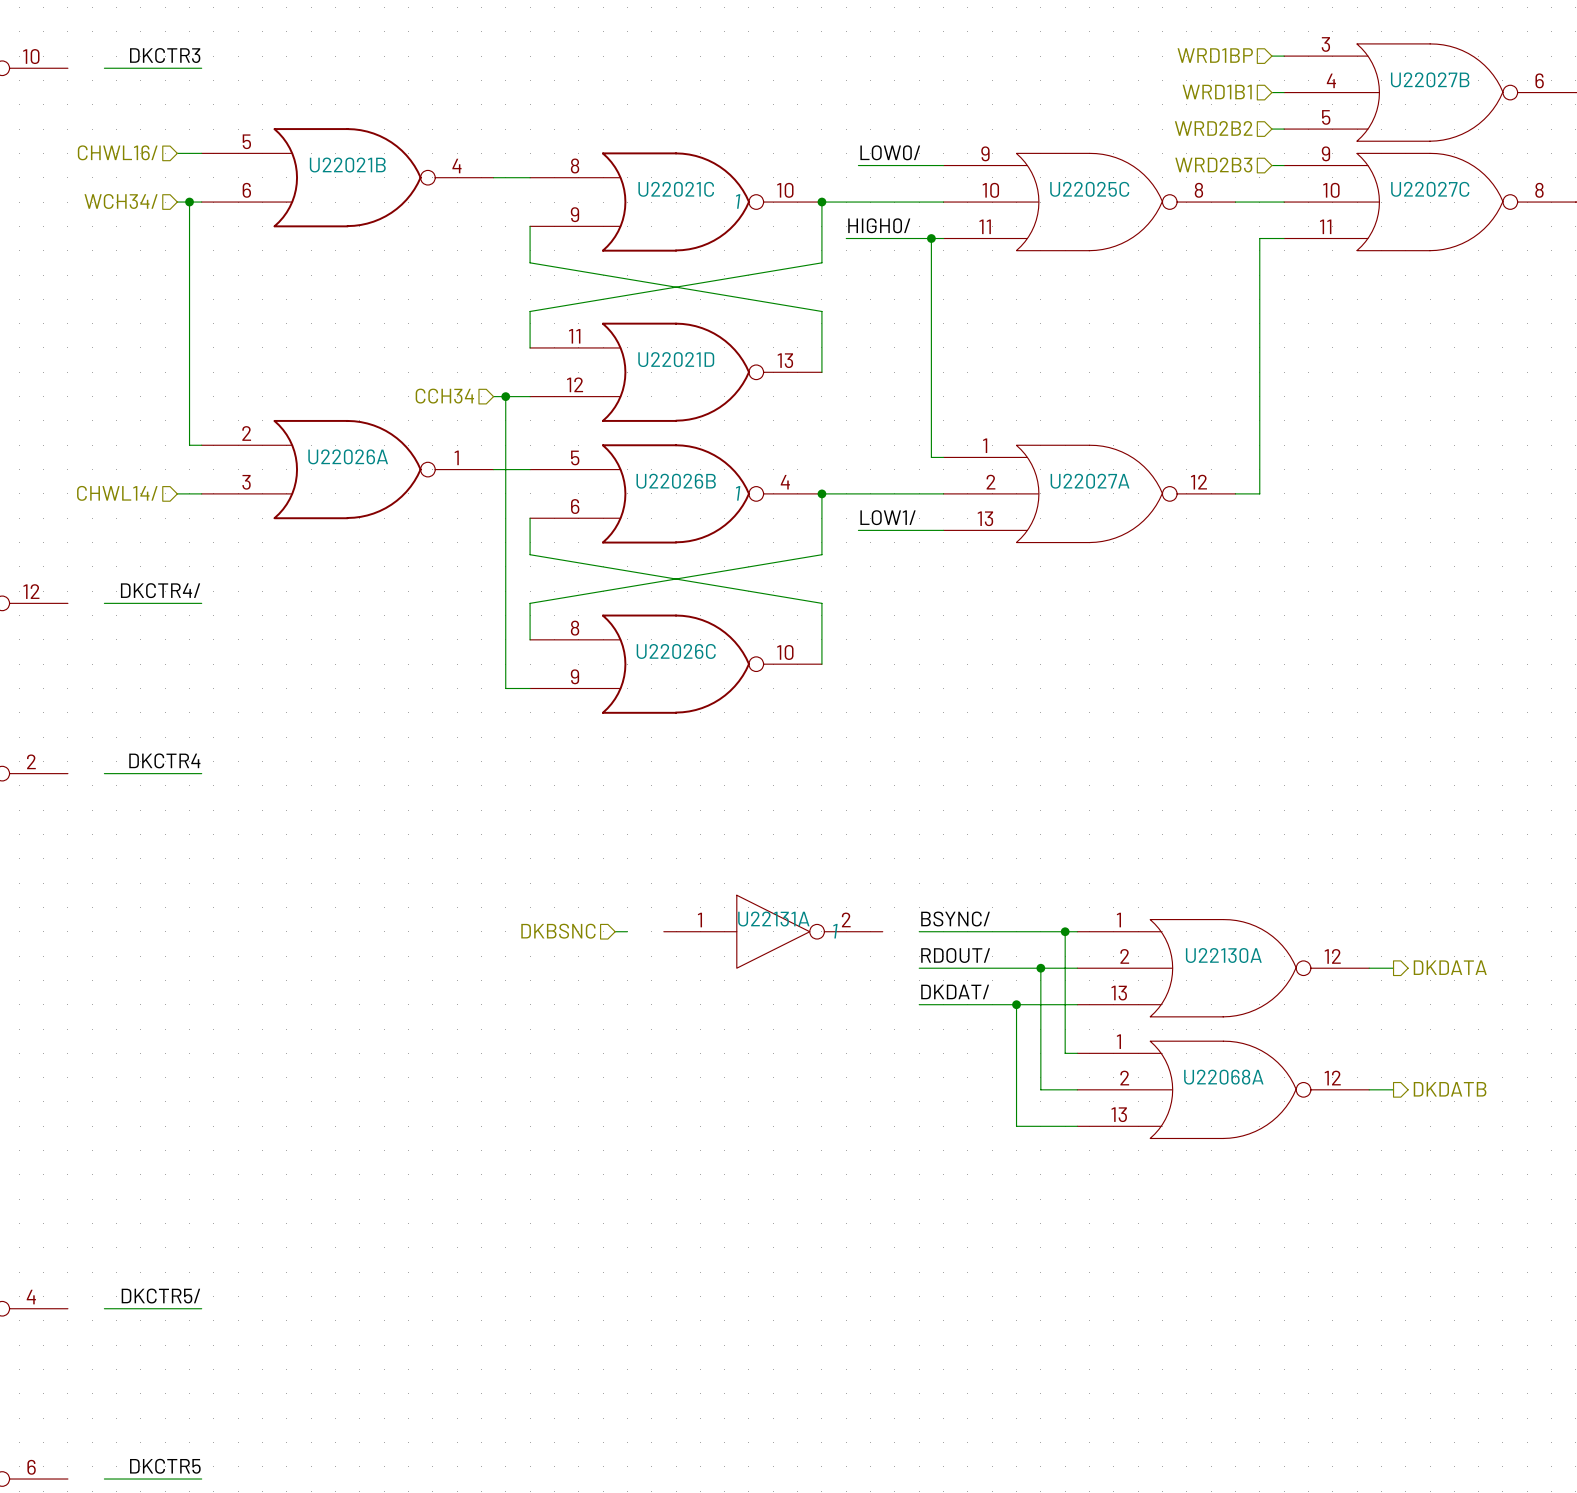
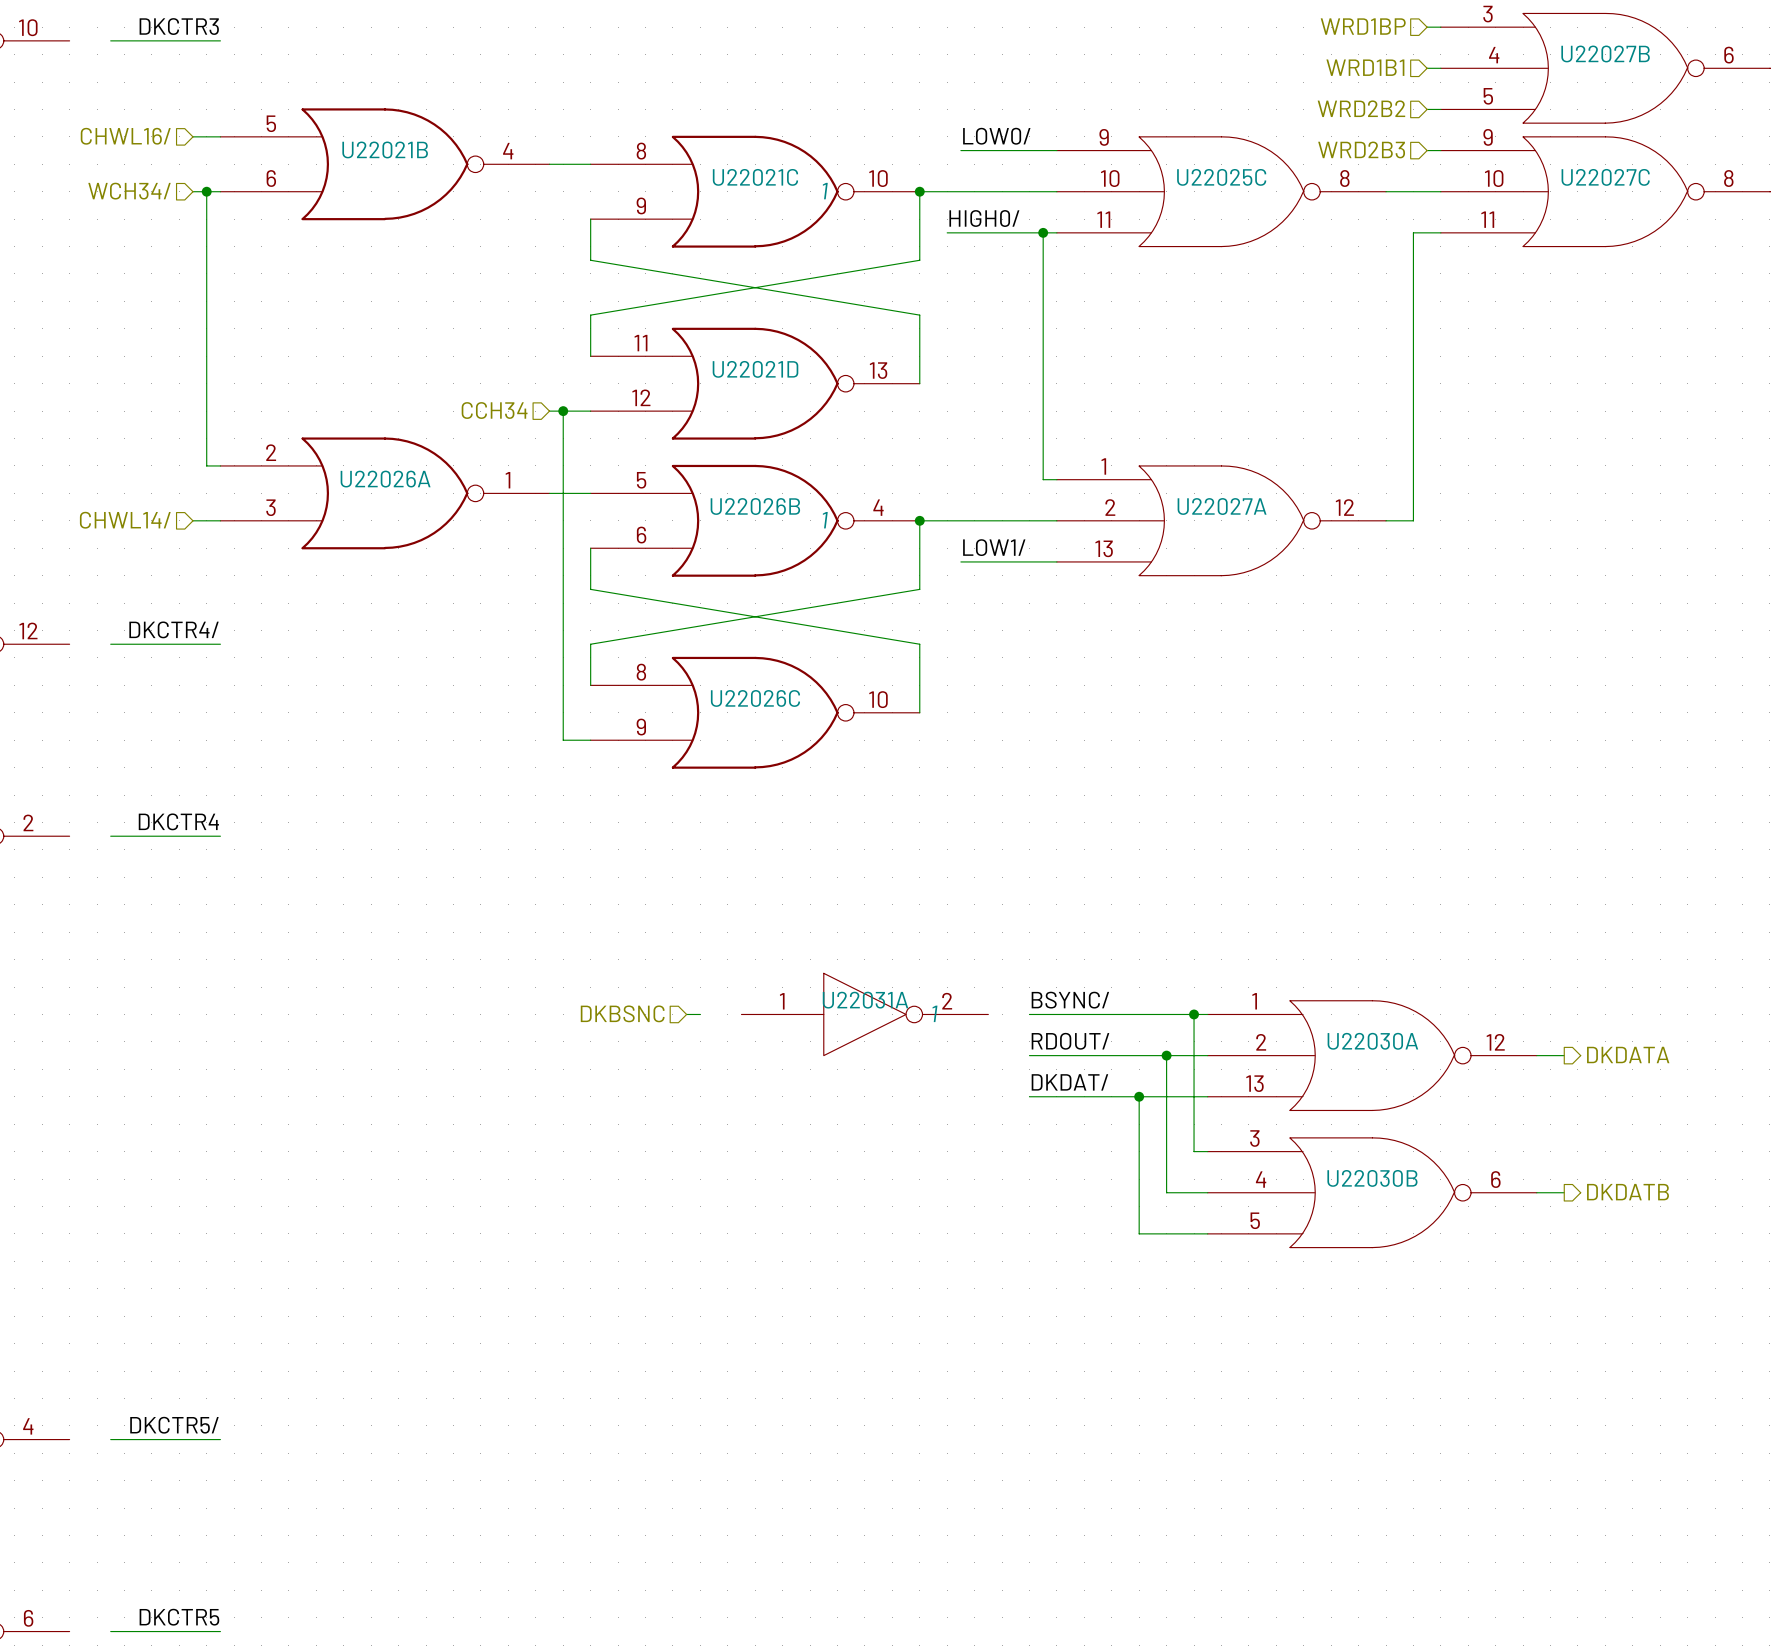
U22131A name: U22131A (773, 919) -> U22031A (865, 1000)
U22130A name: U22130A (1223, 955) -> U22030A (1372, 1041)
U22068A pin number: 1 (1118, 1041) -> 3 (1254, 1138)
U22068A name: U22068A (1223, 1077) -> U22030B (1372, 1178)
U22068A pin number: 2 (1124, 1078) -> 4 (1261, 1179)
U22068A pin number: 12 (1332, 1078) -> 6 (1495, 1179)
U22068A pin number: 13 (1119, 1114) -> 5 (1255, 1220)

